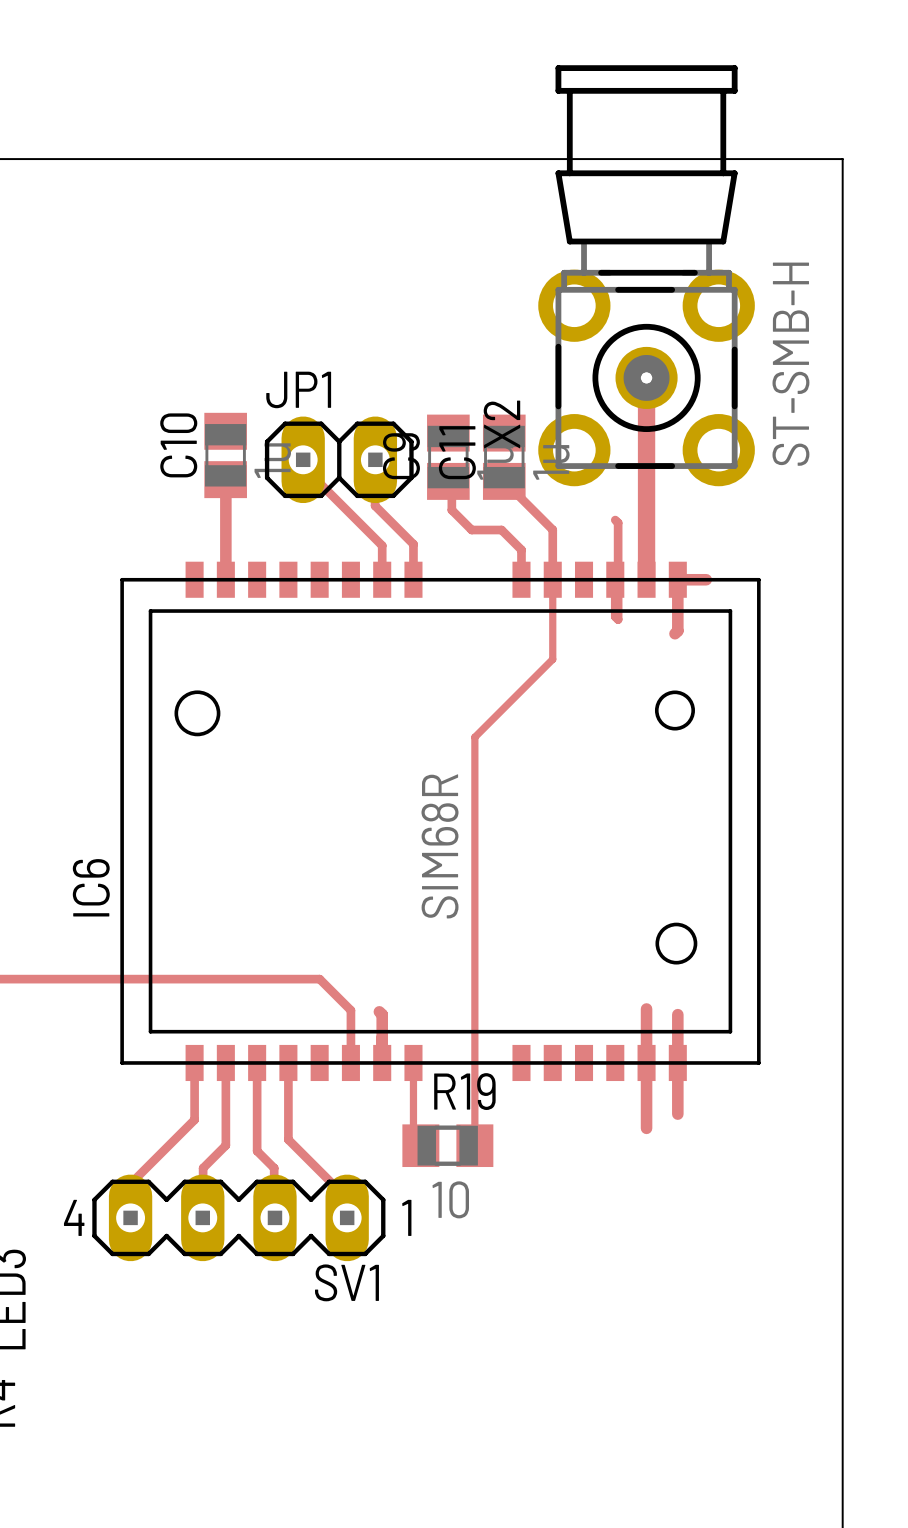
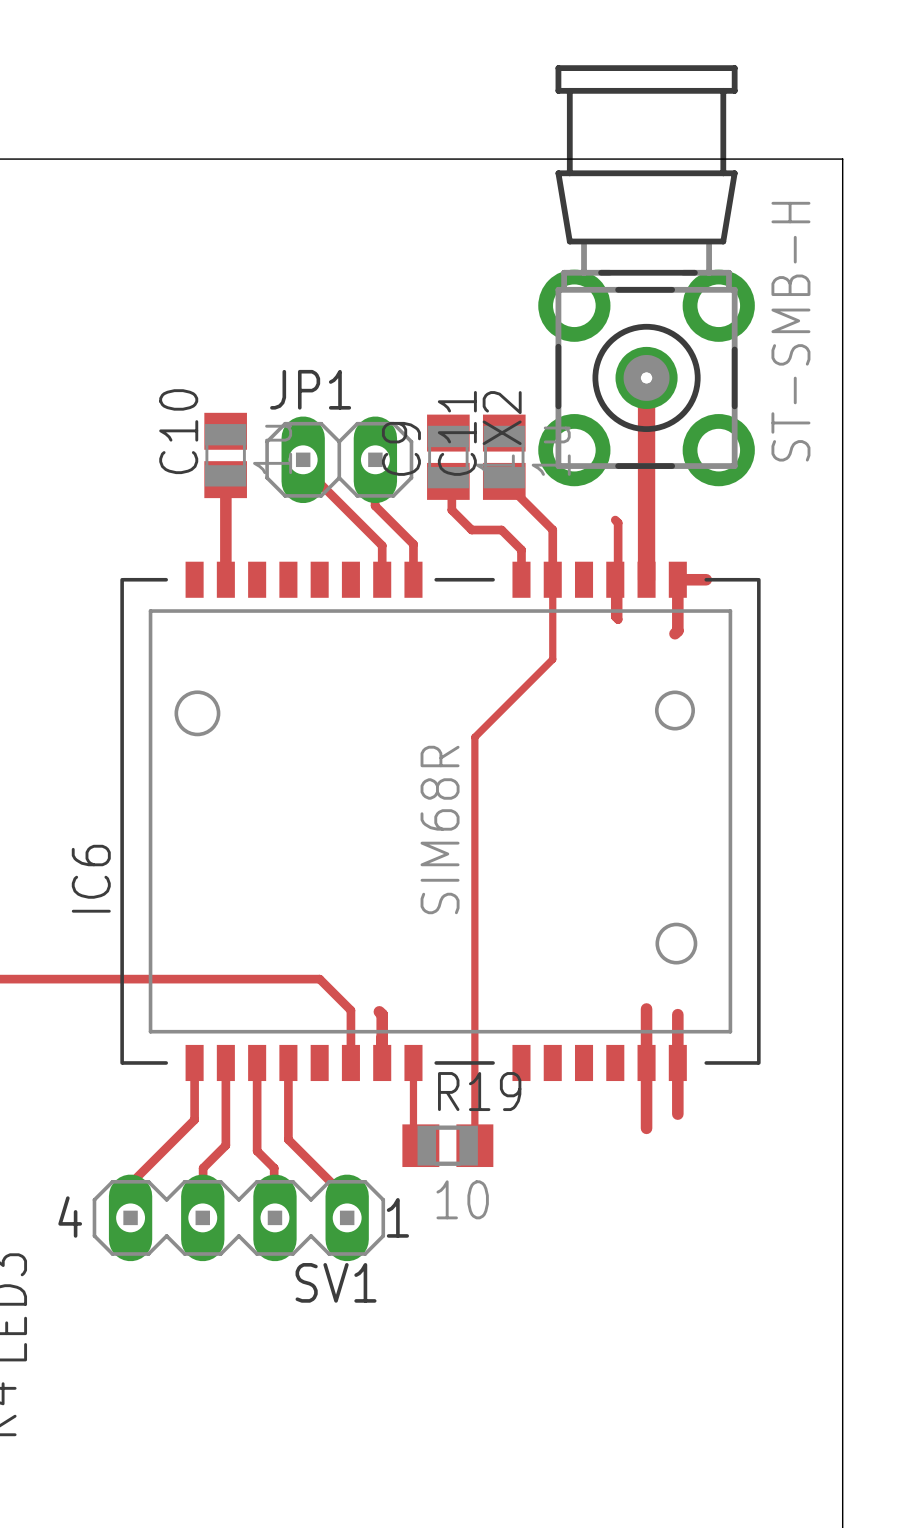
JP1 footprint: [264, 416, 414, 504] -> [265, 416, 414, 504]
IC6 footprint: [120, 561, 761, 1082] -> [120, 561, 761, 1082]
SV1 footprint: [92, 1174, 386, 1262] -> [92, 1174, 386, 1262]

